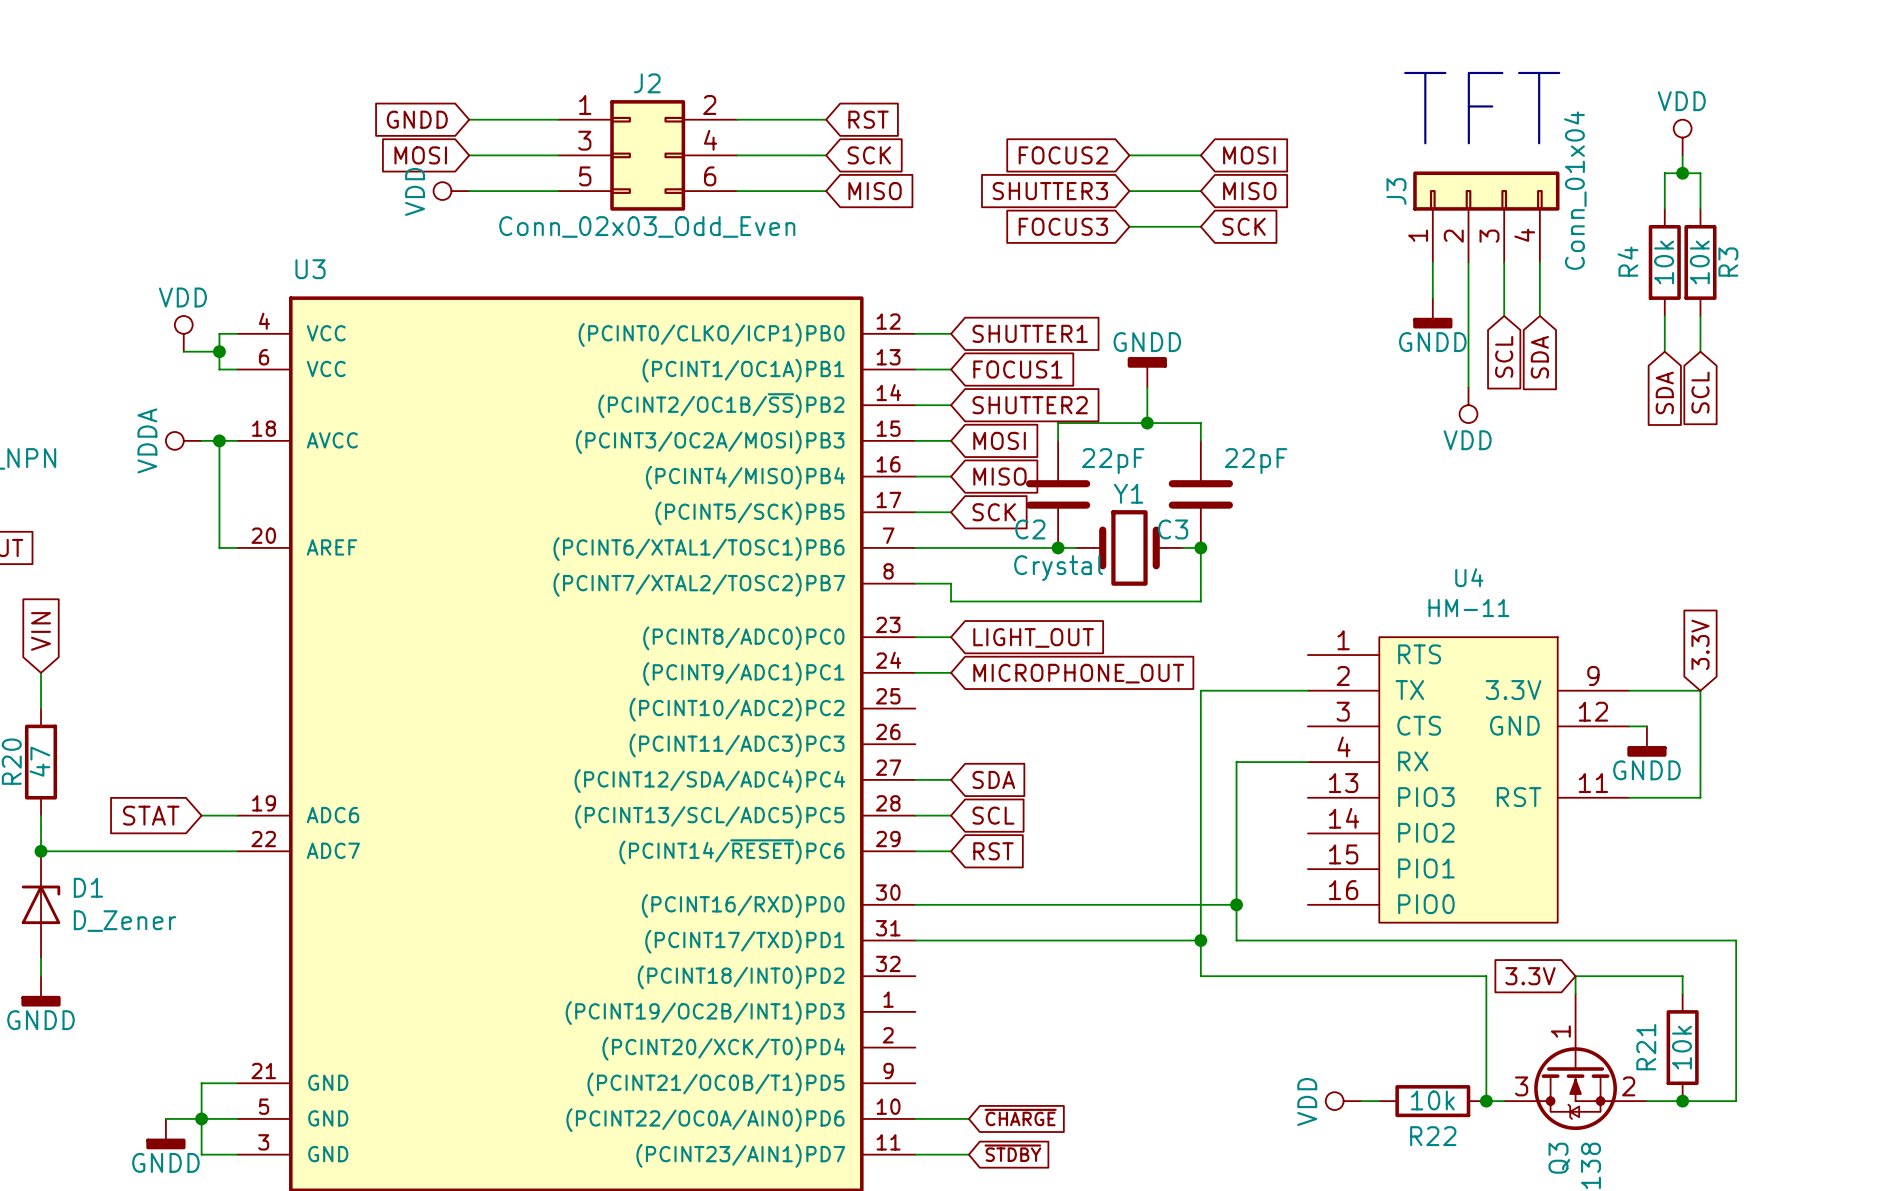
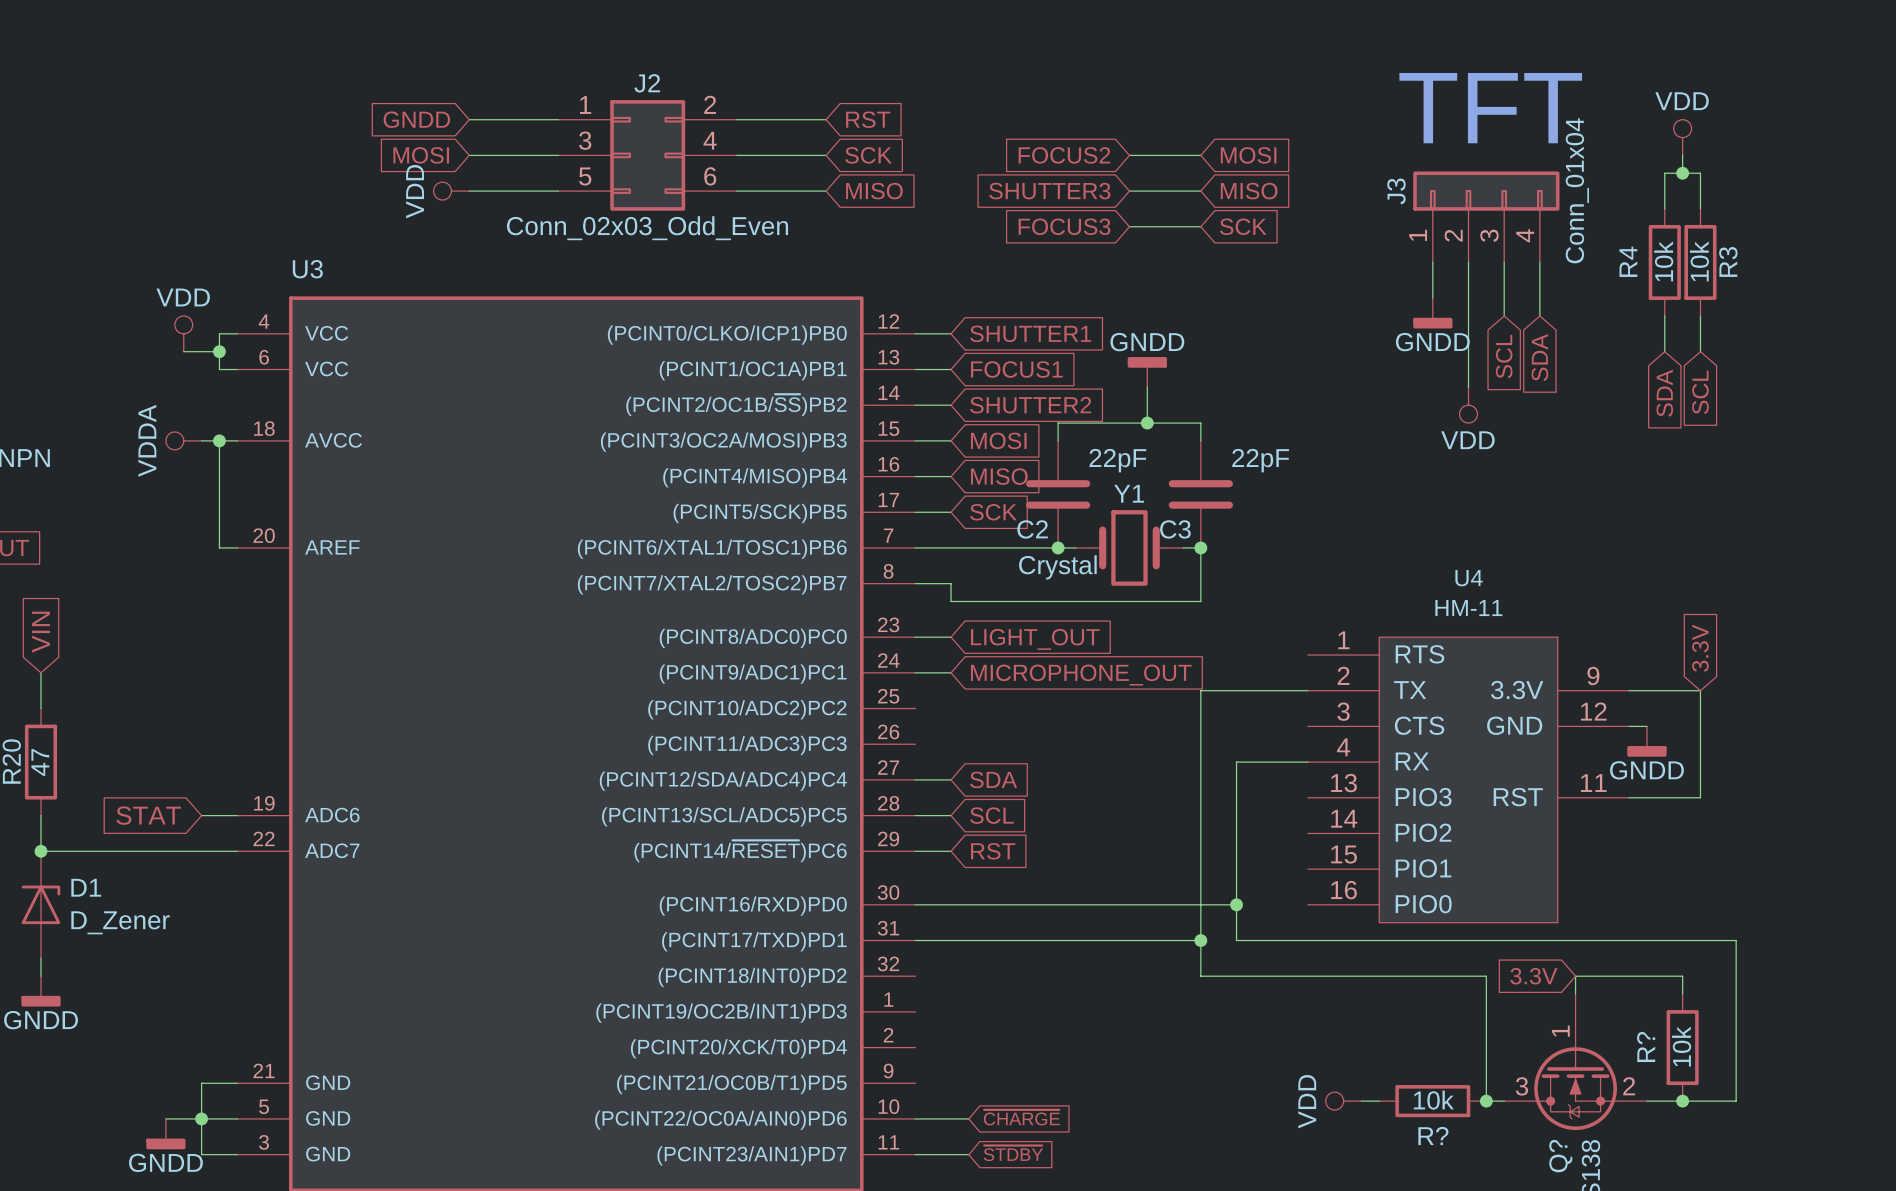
R21 name: R21 (1646, 1047) -> R? (1646, 1047)
R22 name: R22 (1433, 1136) -> R? (1433, 1136)
Q3 name: Q3 (1559, 1158) -> Q? (1560, 1156)

